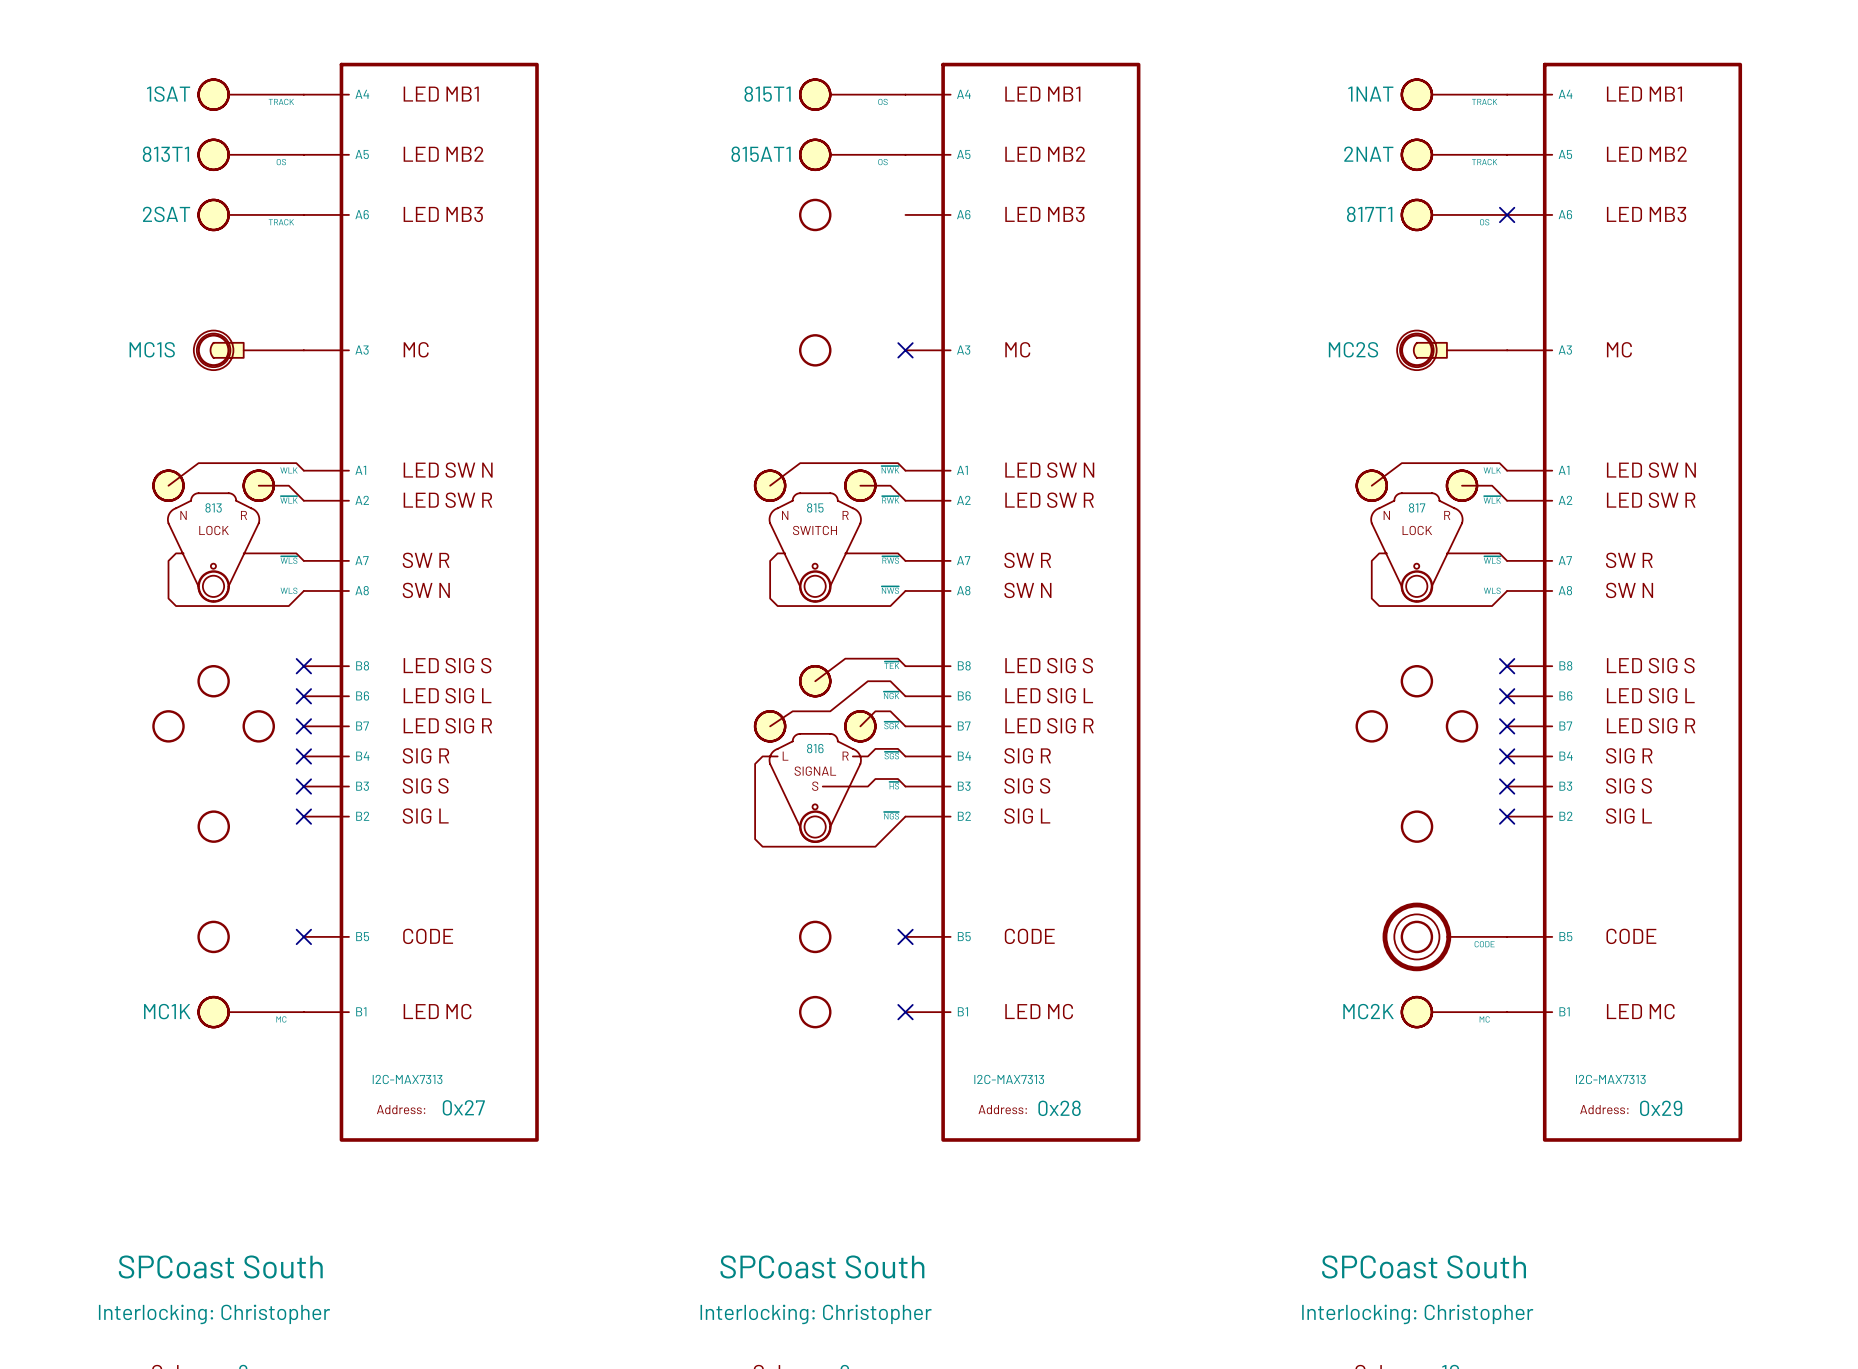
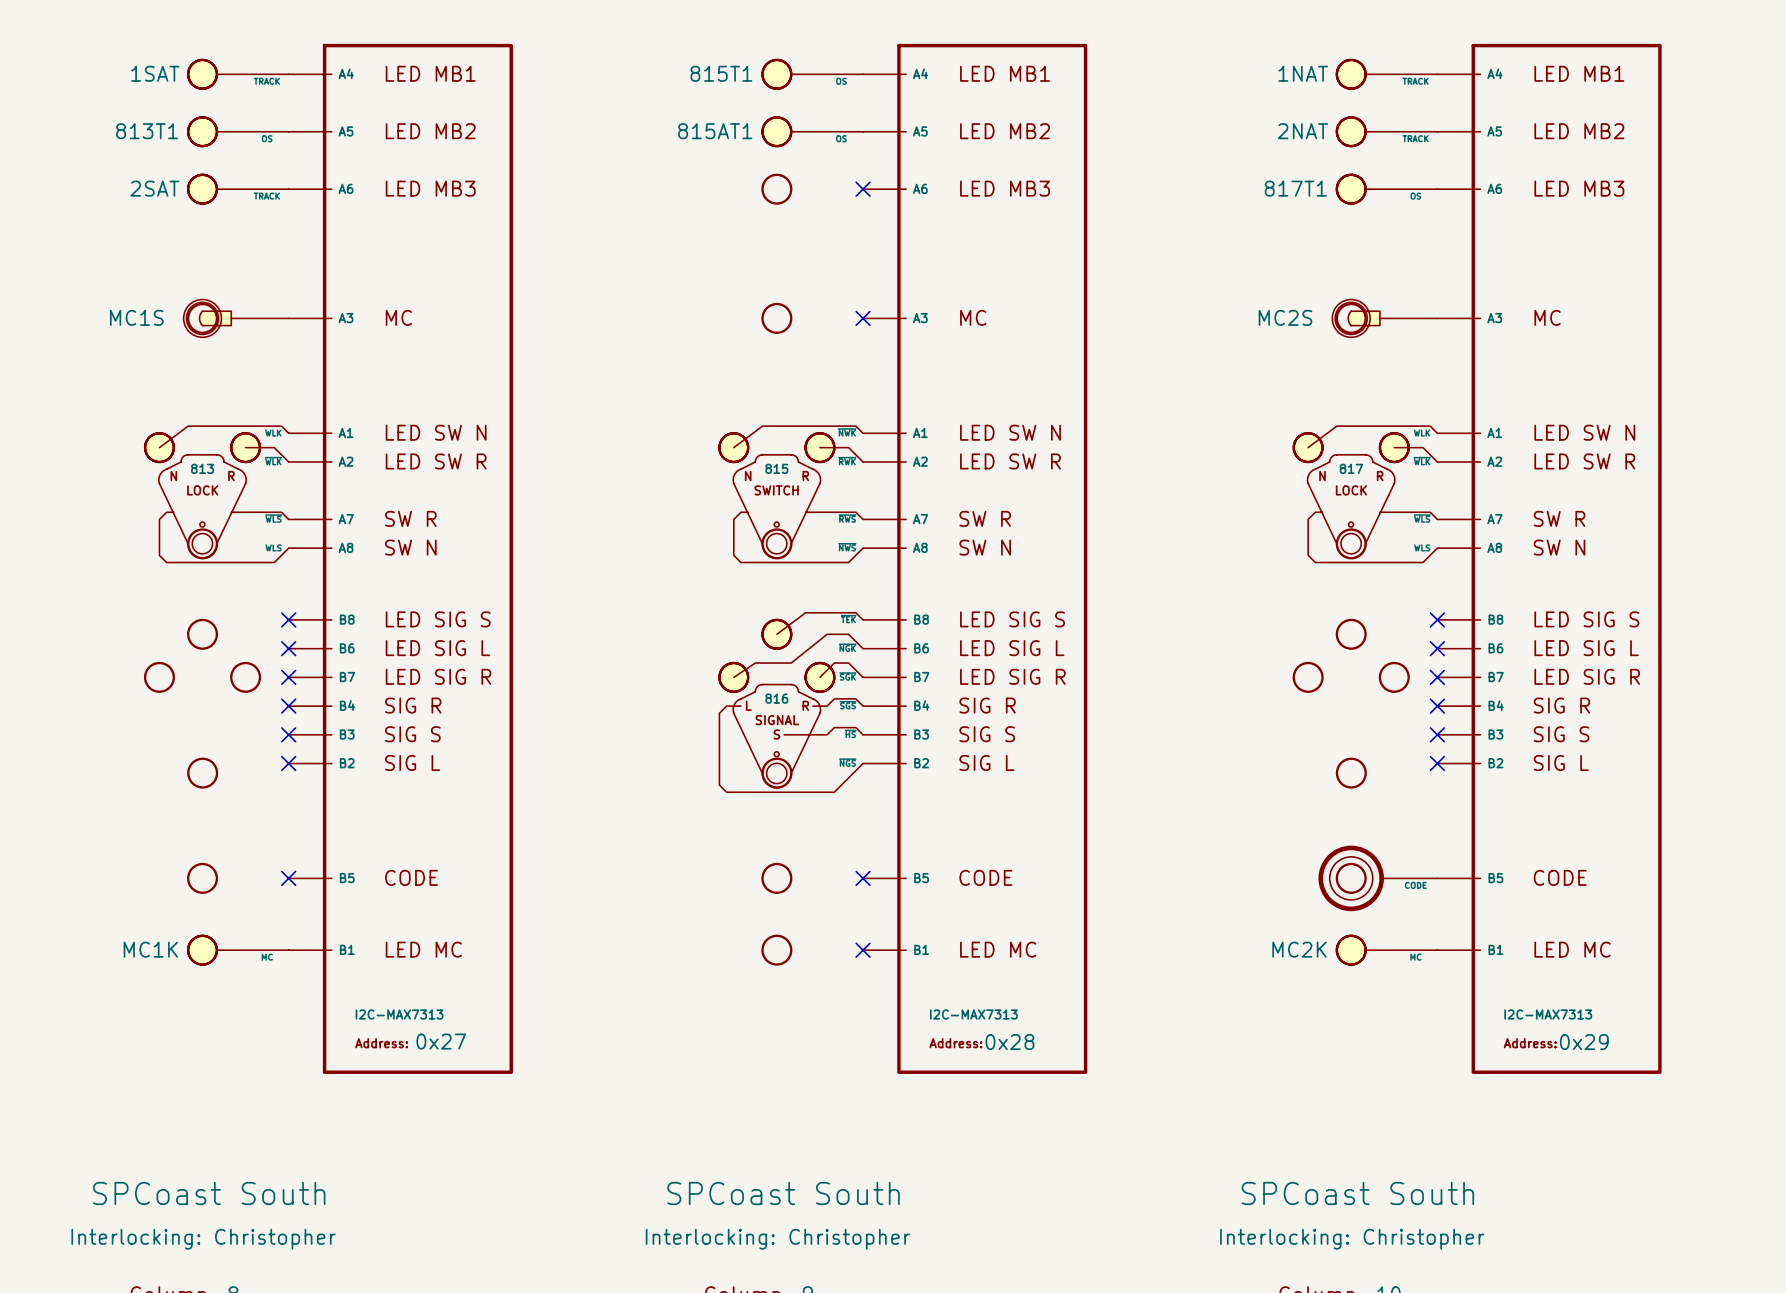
no-connect mark: none -> (863, 189)
no-connect mark: (1507, 214) -> none

